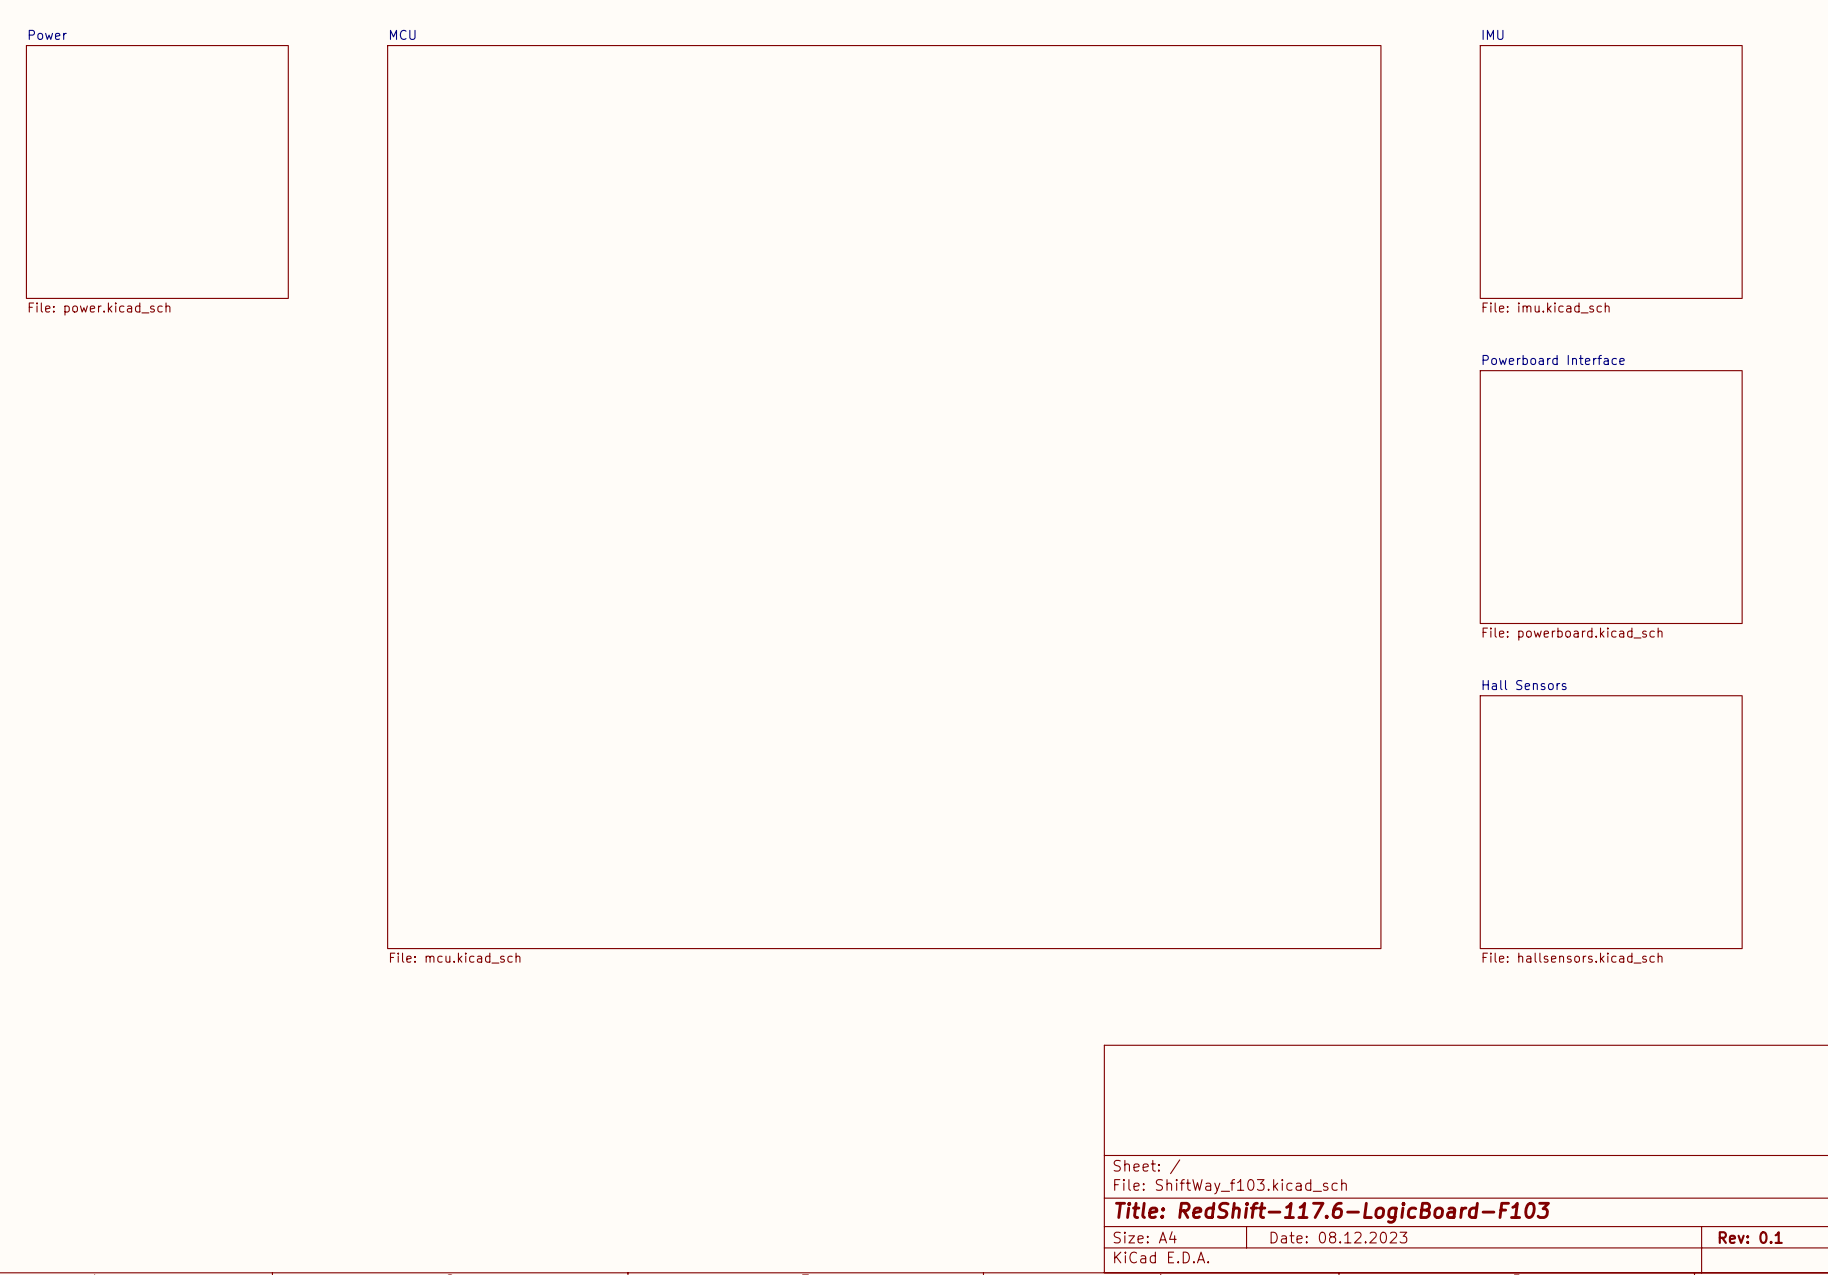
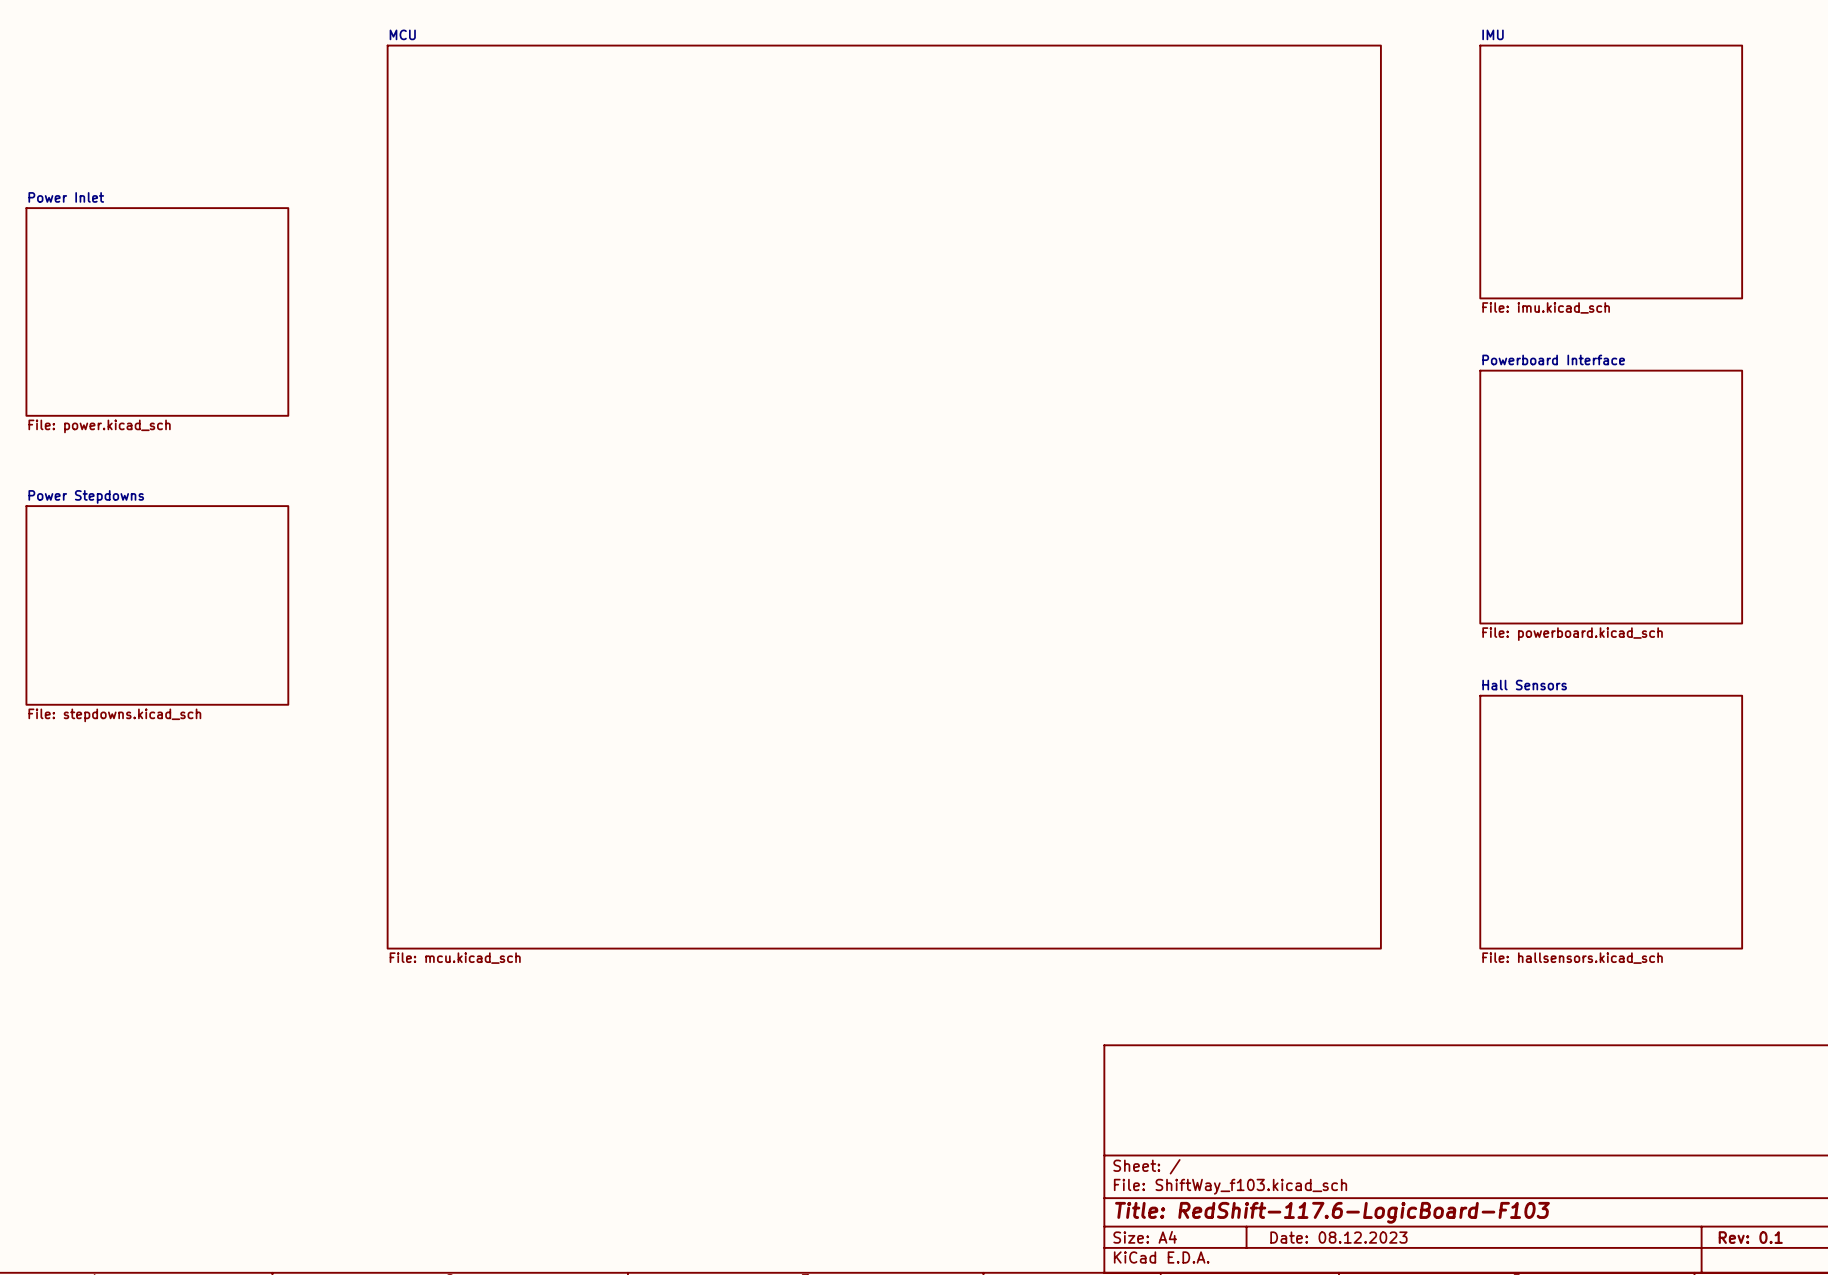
sheet Power: File: power.kicad_sch (157, 171) -> none
sheet Power Inlet: none -> File: power.kicad_sch (157, 311)
sheet Power Stepdowns: none -> File: stepdowns.kicad_sch (157, 605)

